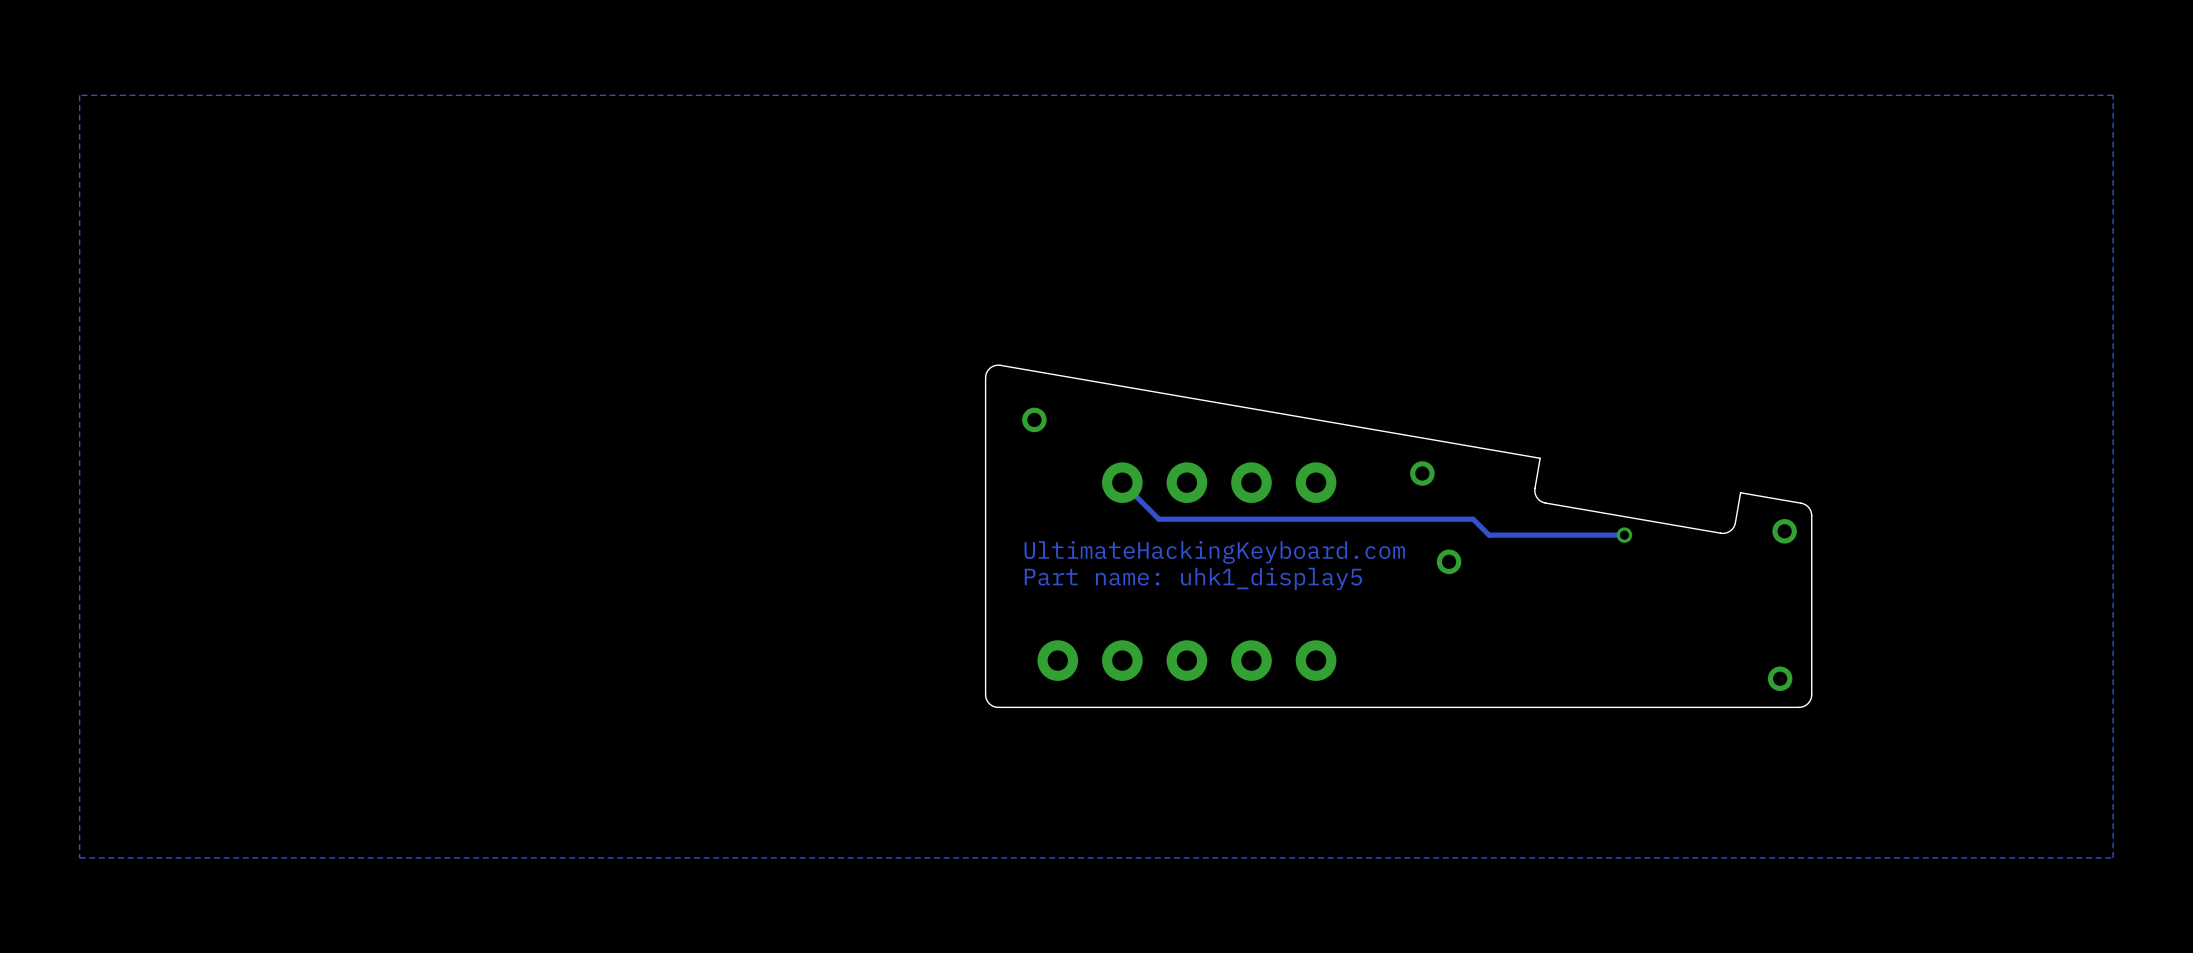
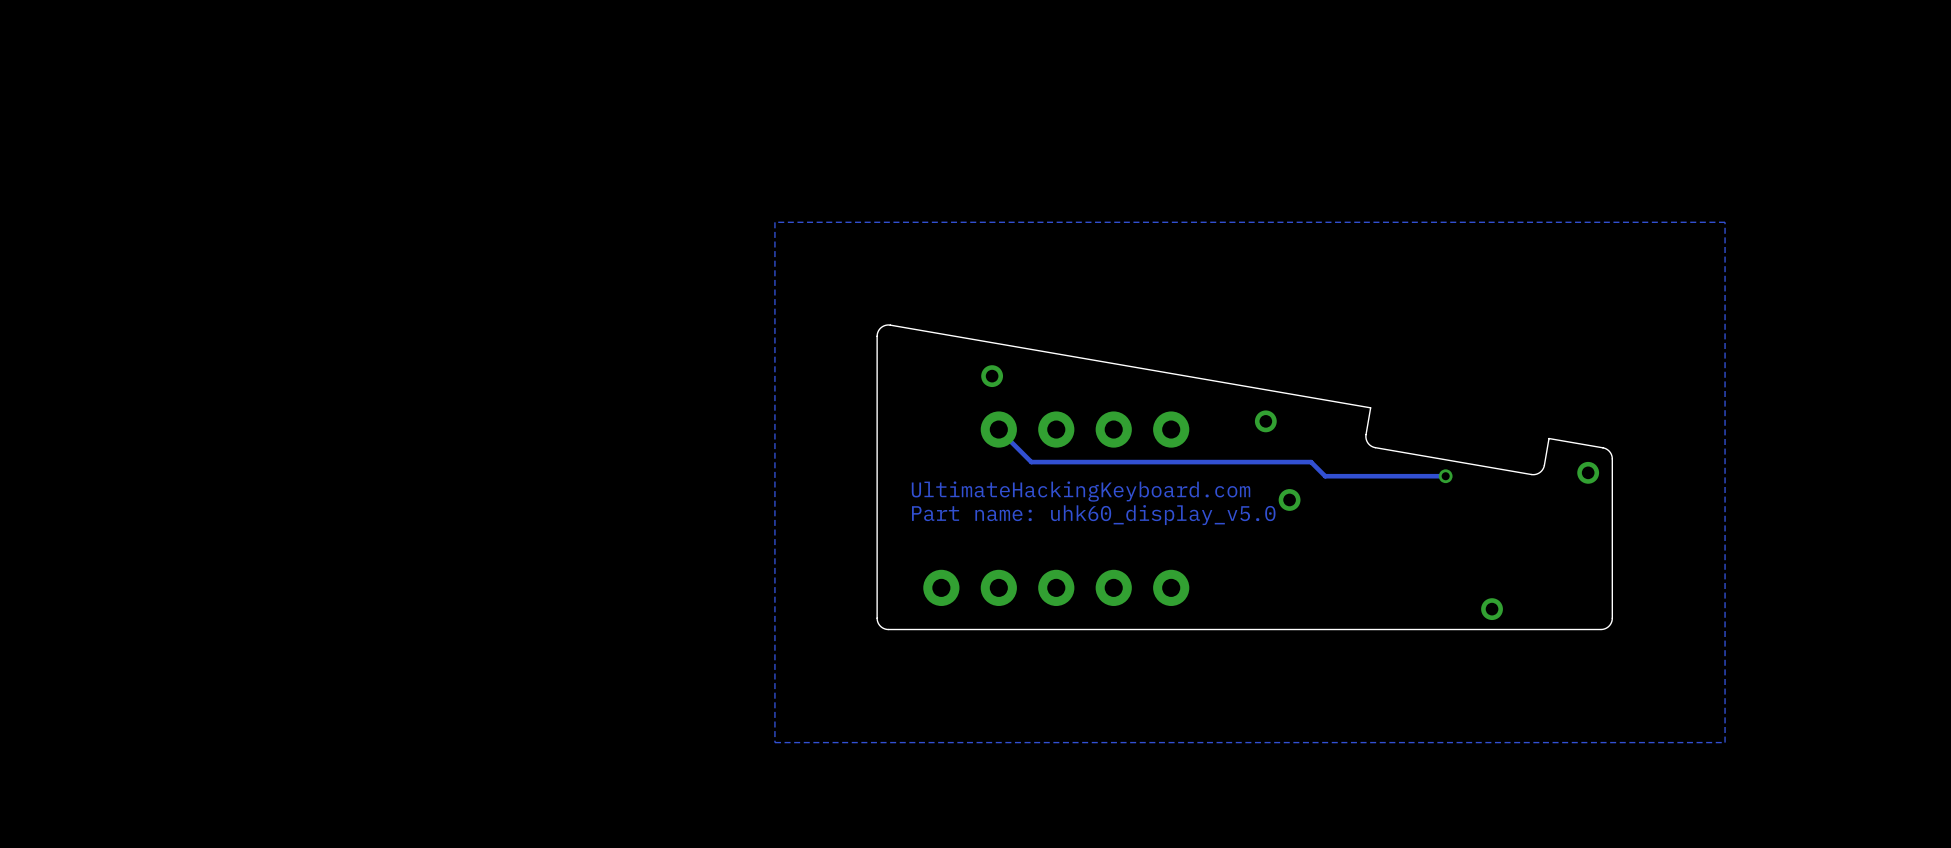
zone outline: (2113, 95) (79, 95) (79, 857) (2113, 857) (2113, 95) -> none
zone outline: none -> (1725, 222) (1725, 742) (774, 742) (774, 222) (1725, 222)
part position: (1034, 419) -> (992, 376)
text: Part name: uhk1_display5 (1193, 578) -> Part name: uhk60_display_v5.0 (1093, 515)
part position: (1780, 678) -> (1492, 609)

